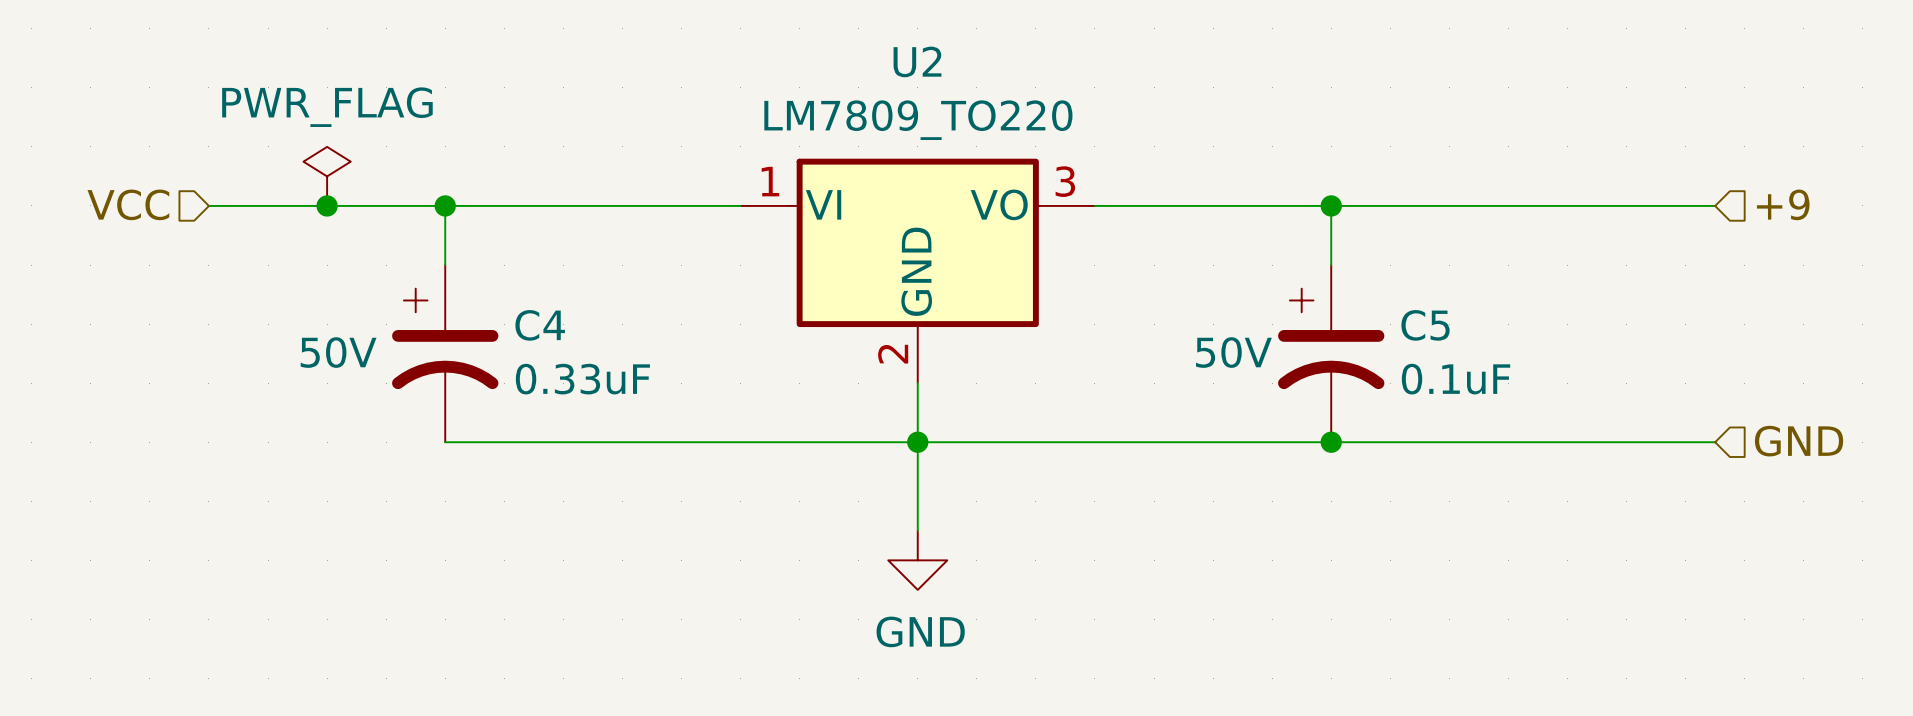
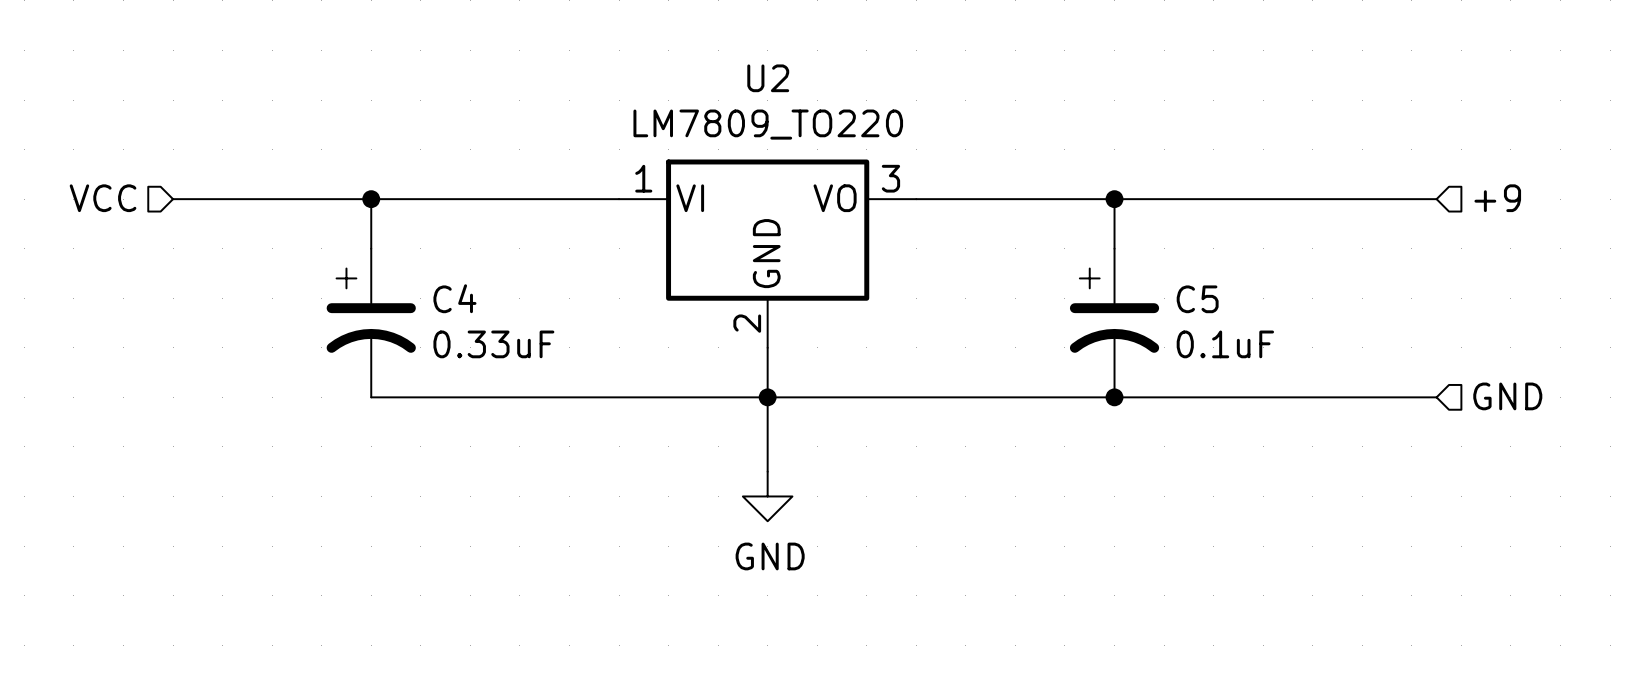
power symbol: PWR_FLAG (327, 176) -> none
junction: (327, 205) -> none
C4 text: 50V (338, 352) -> none
C5 text: 50V (1233, 352) -> none

